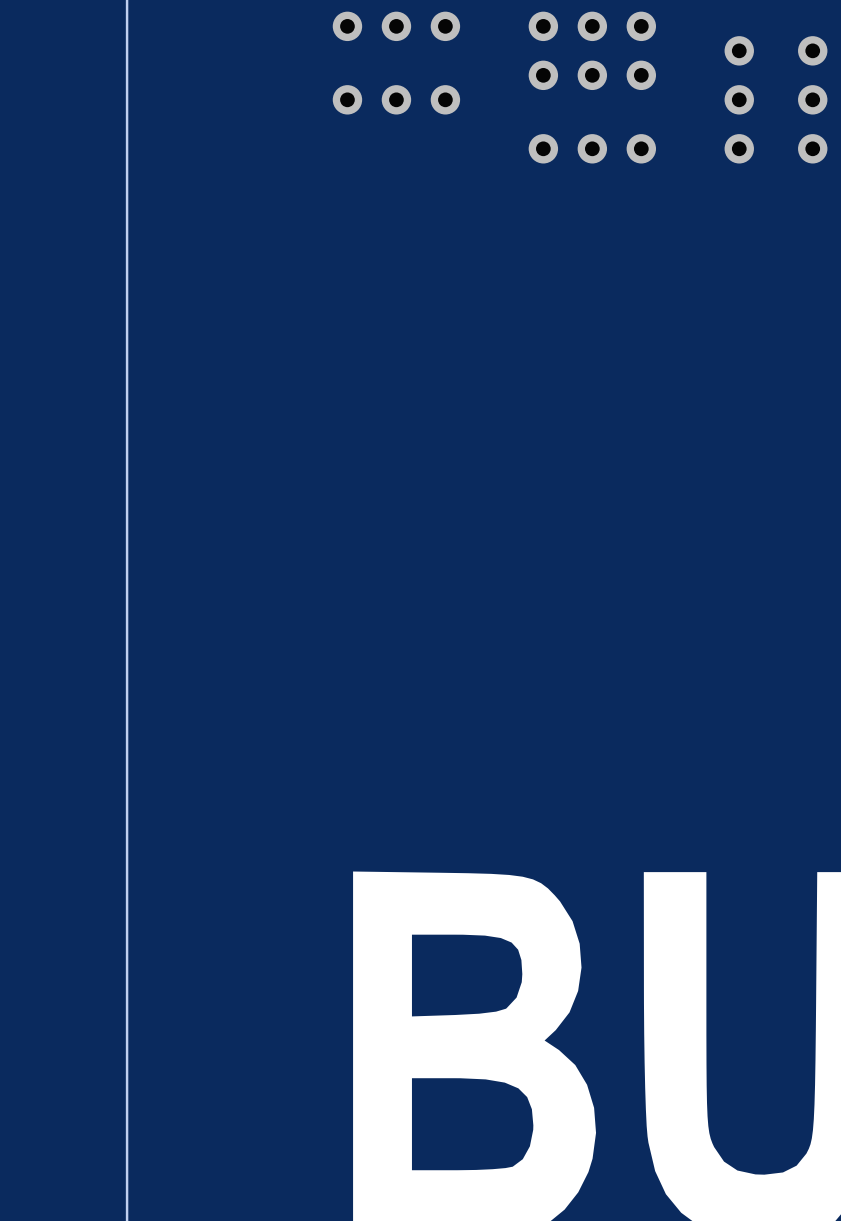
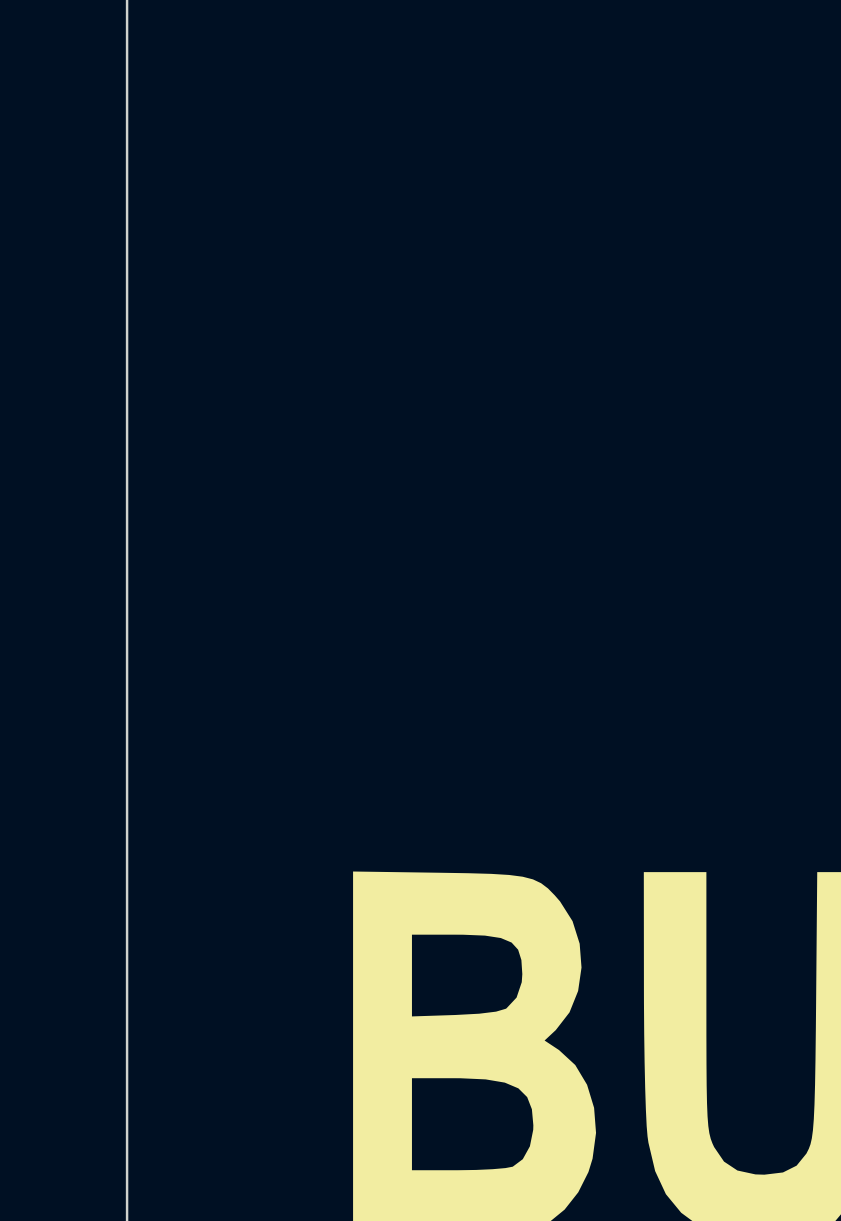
via: (347, 26) -> none
via: (396, 26) -> none
via: (445, 26) -> none
via: (543, 26) -> none
via: (592, 26) -> none
via: (641, 26) -> none
via: (739, 50) -> none
via: (812, 50) -> none
via: (543, 75) -> none
via: (592, 75) -> none
via: (641, 75) -> none
via: (347, 99) -> none
via: (396, 99) -> none
via: (445, 99) -> none
via: (739, 99) -> none
via: (812, 99) -> none
via: (543, 148) -> none
via: (592, 148) -> none
via: (641, 148) -> none
via: (739, 148) -> none
via: (812, 148) -> none

